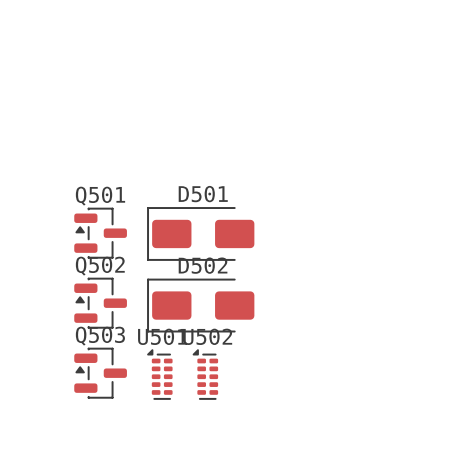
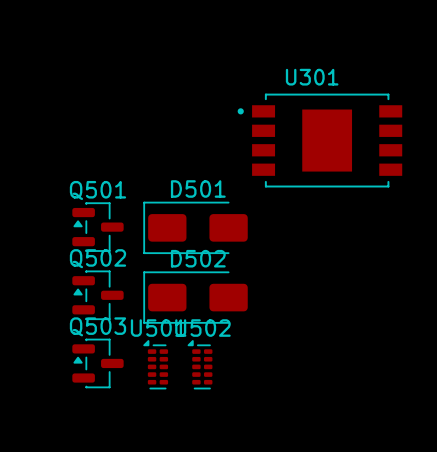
U301: none -> (319, 140)

